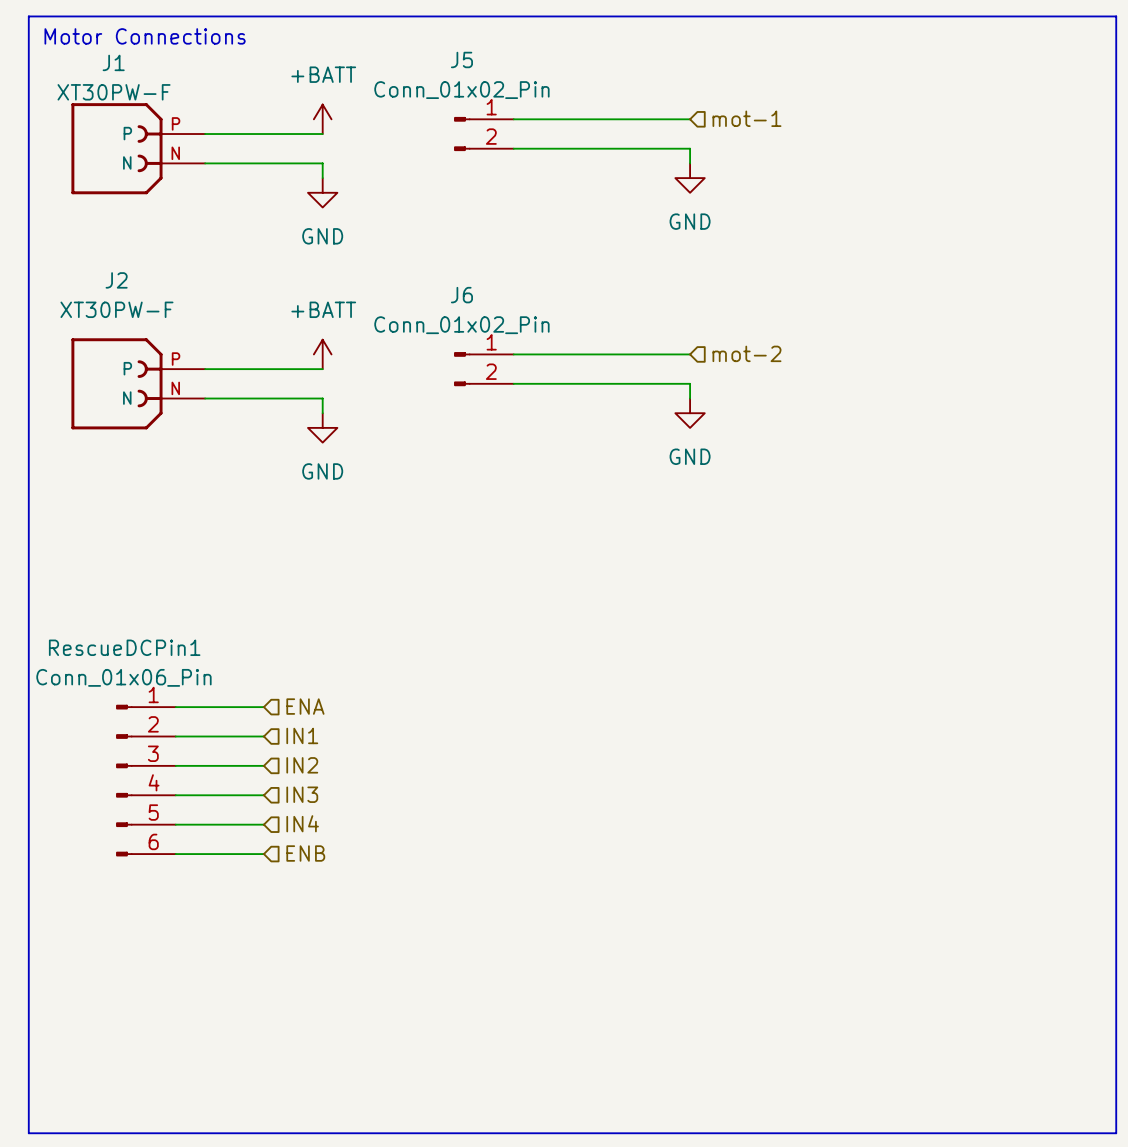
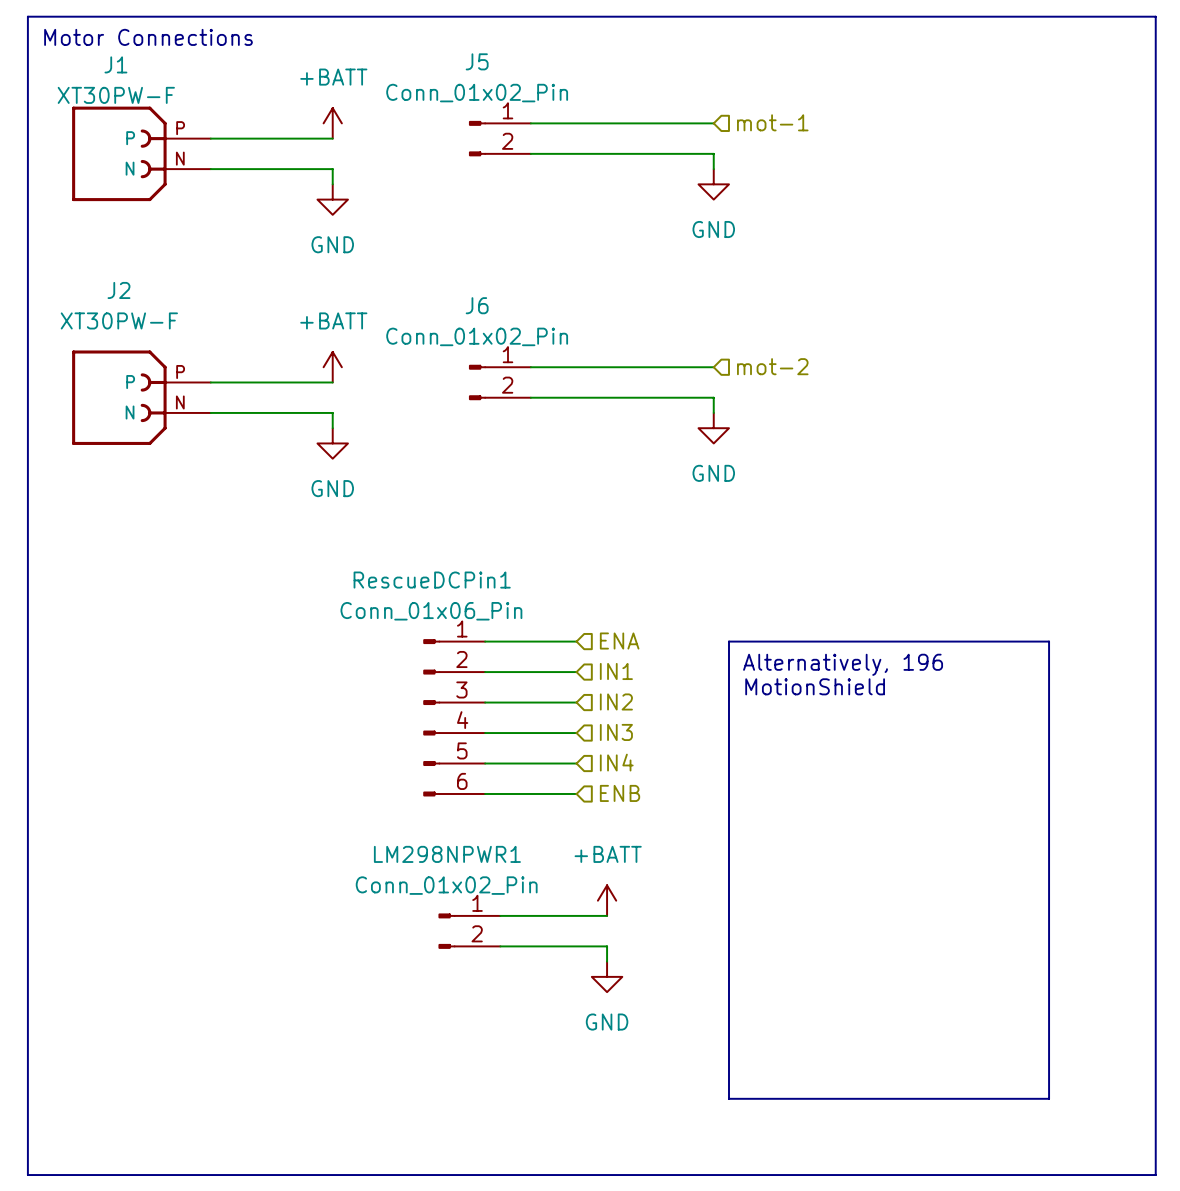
wire: none -> (485, 641) (576, 641)
hierarchical label: none -> ENA (619, 641)
line: none -> (728, 641) (1049, 641) (1049, 1098) (728, 1098) (728, 641)
text: none -> Alternatively, 196 (843, 664)
hierarchical label: none -> IN1 (616, 671)
wire: none -> (485, 672) (576, 672)
text: none -> MotionShield (815, 686)
wire: none -> (485, 702) (576, 702)
hierarchical label: none -> IN2 (616, 701)
hierarchical label: ENA (305, 706) -> none
hierarchical label: none -> IN3 (616, 732)
wire: (175, 707) (263, 707) -> none
wire: none -> (485, 733) (576, 733)
hierarchical label: IN1 (302, 735) -> none
hierarchical label: none -> IN4 (616, 762)
wire: (175, 736) (263, 736) -> none
wire: none -> (485, 763) (576, 763)
wire: (175, 765) (263, 765) -> none
hierarchical label: IN2 (302, 765) -> none
wire: none -> (485, 793) (576, 793)
hierarchical label: none -> ENB (620, 793)
RescueDCPin1 position: (145, 780) -> (454, 717)
hierarchical label: IN3 (302, 794) -> none
wire: (175, 795) (263, 795) -> none
hierarchical label: IN4 (302, 823) -> none
wire: (175, 824) (263, 824) -> none
hierarchical label: ENB (305, 853) -> none
wire: (175, 854) (263, 854) -> none
power symbol: none -> +BATT (607, 900)
wire: none -> (500, 915) (607, 915)
LM298NPWR1: none -> Conn_01x02_Pin (469, 931)
wire: none -> (500, 946) (607, 946) (607, 961)
power symbol: none -> GND (607, 976)

